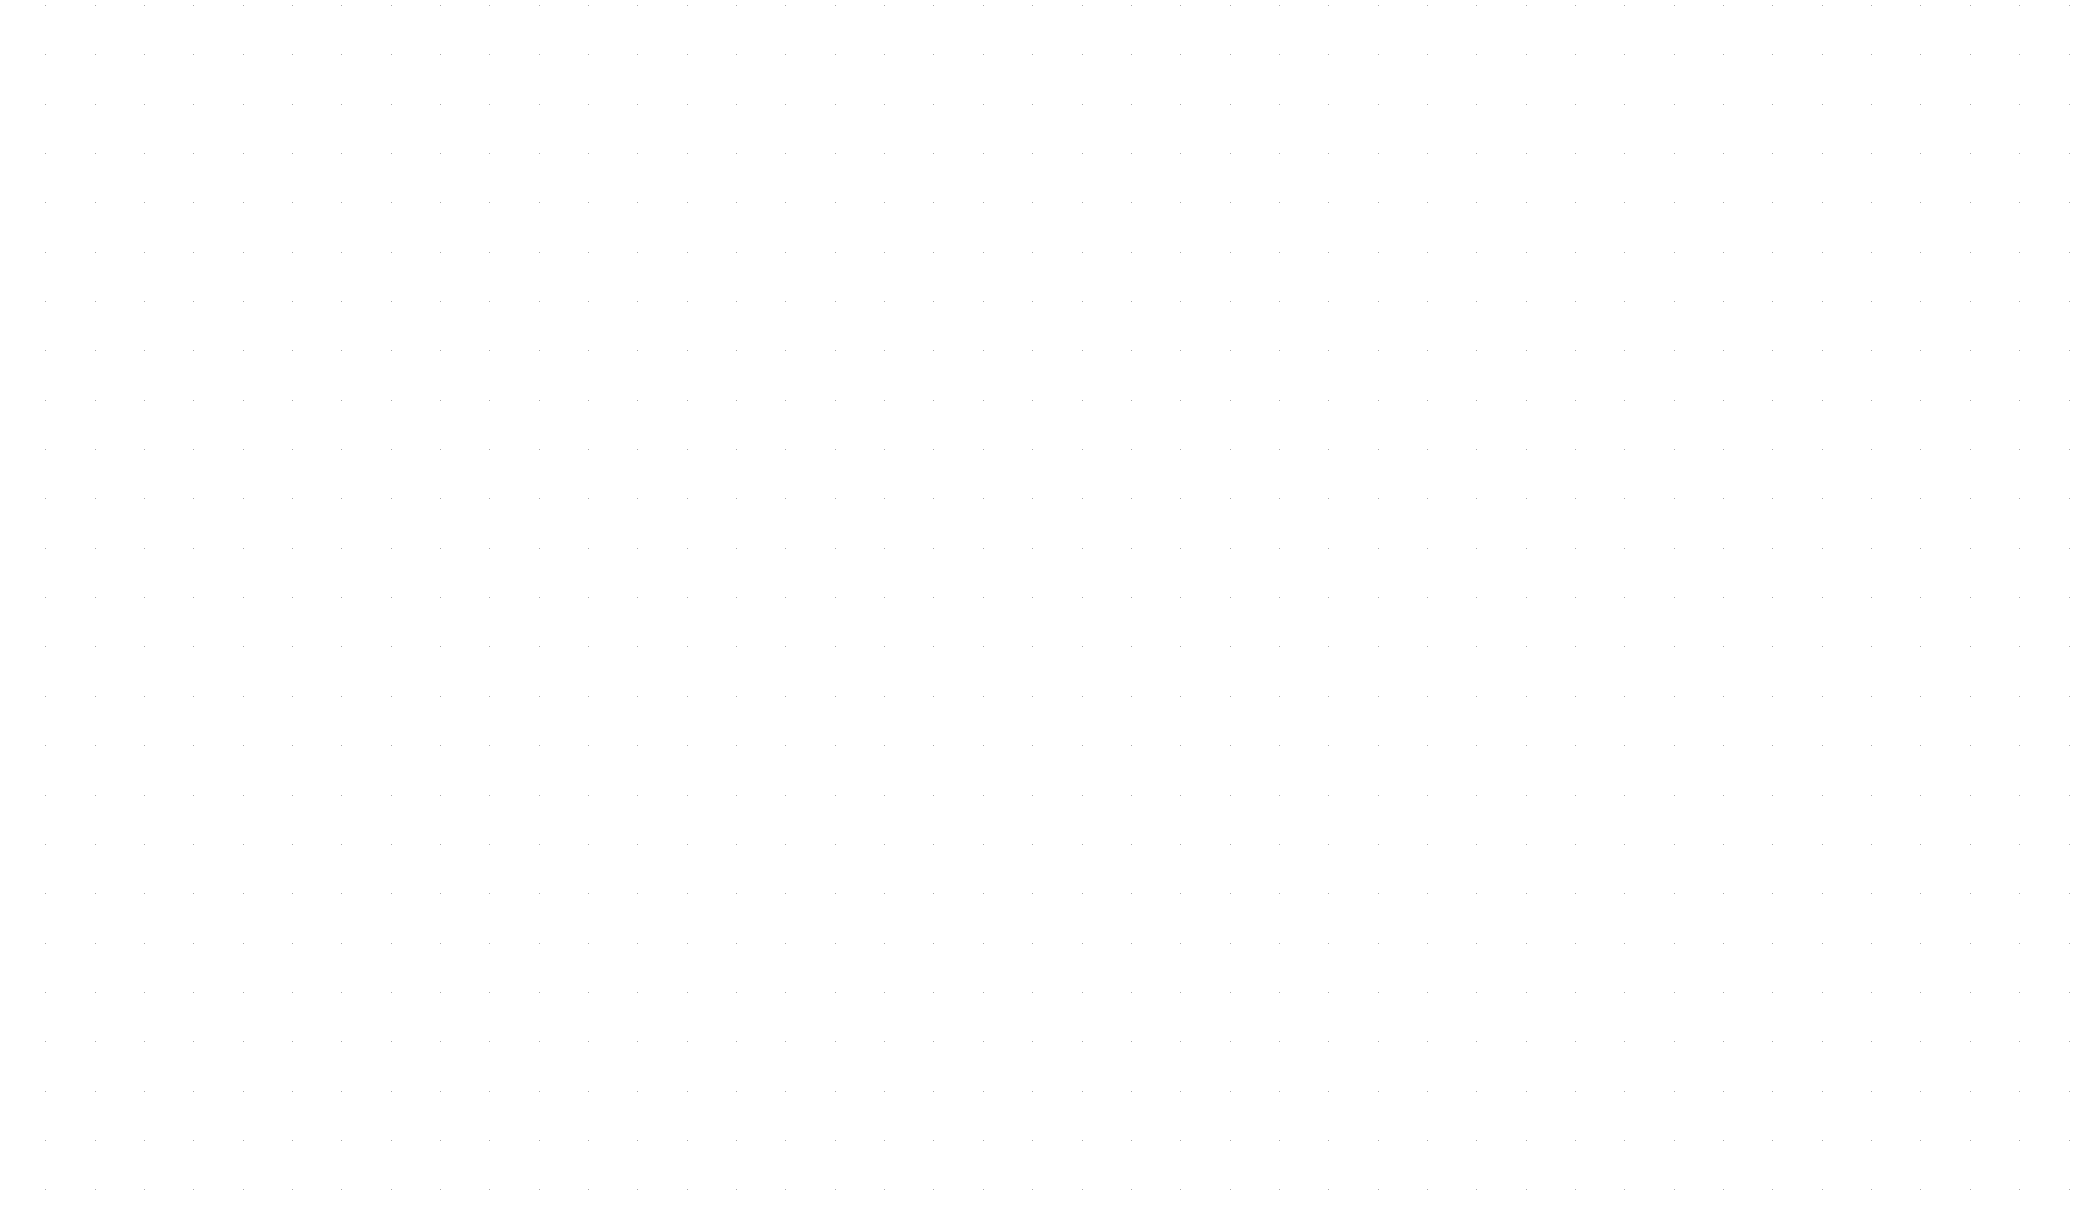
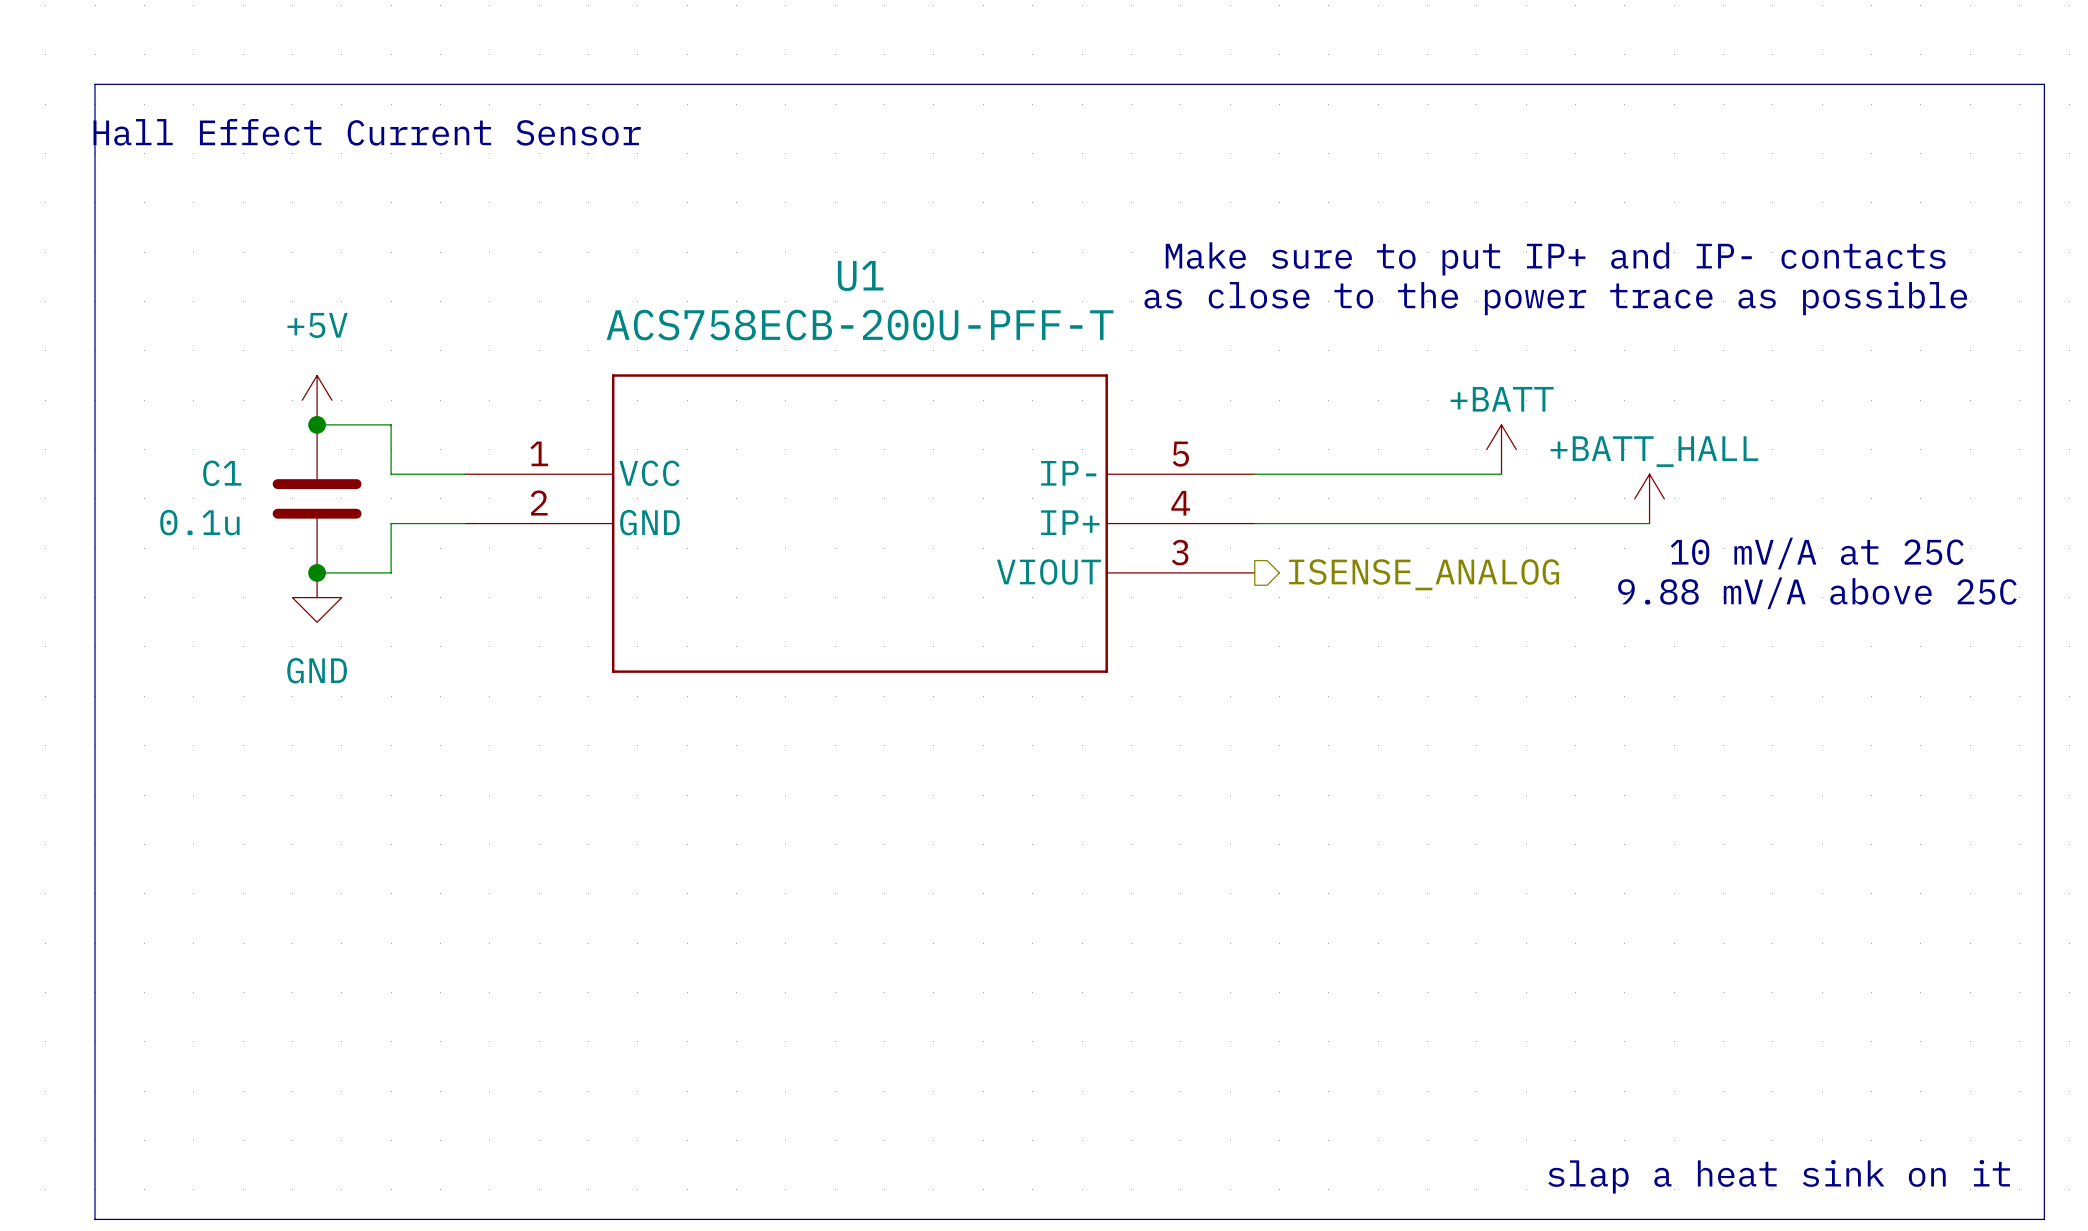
line: none -> (95, 84) (2044, 84) (2044, 1219) (95, 1219) (95, 84)
text: none -> Hall Effect Current Sensor (367, 132)
text: none -> Make sure to put IP+ and IP- contacts (1555, 258)
text: none -> as close to the power trace as possible (1555, 298)
power symbol: none -> +5V (317, 400)
wire: none -> (317, 424) (391, 424) (391, 474) (465, 474)
junction: none -> (317, 424)
power symbol: none -> +BATT (1501, 449)
wire: none -> (1254, 474) (1501, 474)
C1: none -> 0.1u (317, 498)
power symbol: none -> +BATT_HALL (1649, 498)
wire: none -> (465, 523) (391, 523) (391, 572) (317, 572)
U1: none -> ACS758ECB-200U-PFF-T (859, 523)
wire: none -> (1254, 523) (1649, 523)
text: none -> 10 mV/A at 25C (1817, 553)
junction: none -> (317, 572)
hierarchical label: none -> ISENSE_ANALOG (1424, 574)
text: none -> 9.88 mV/A above 25C (1817, 593)
power symbol: none -> GND (317, 597)
text: none -> slap a heat sink on it (1779, 1176)

